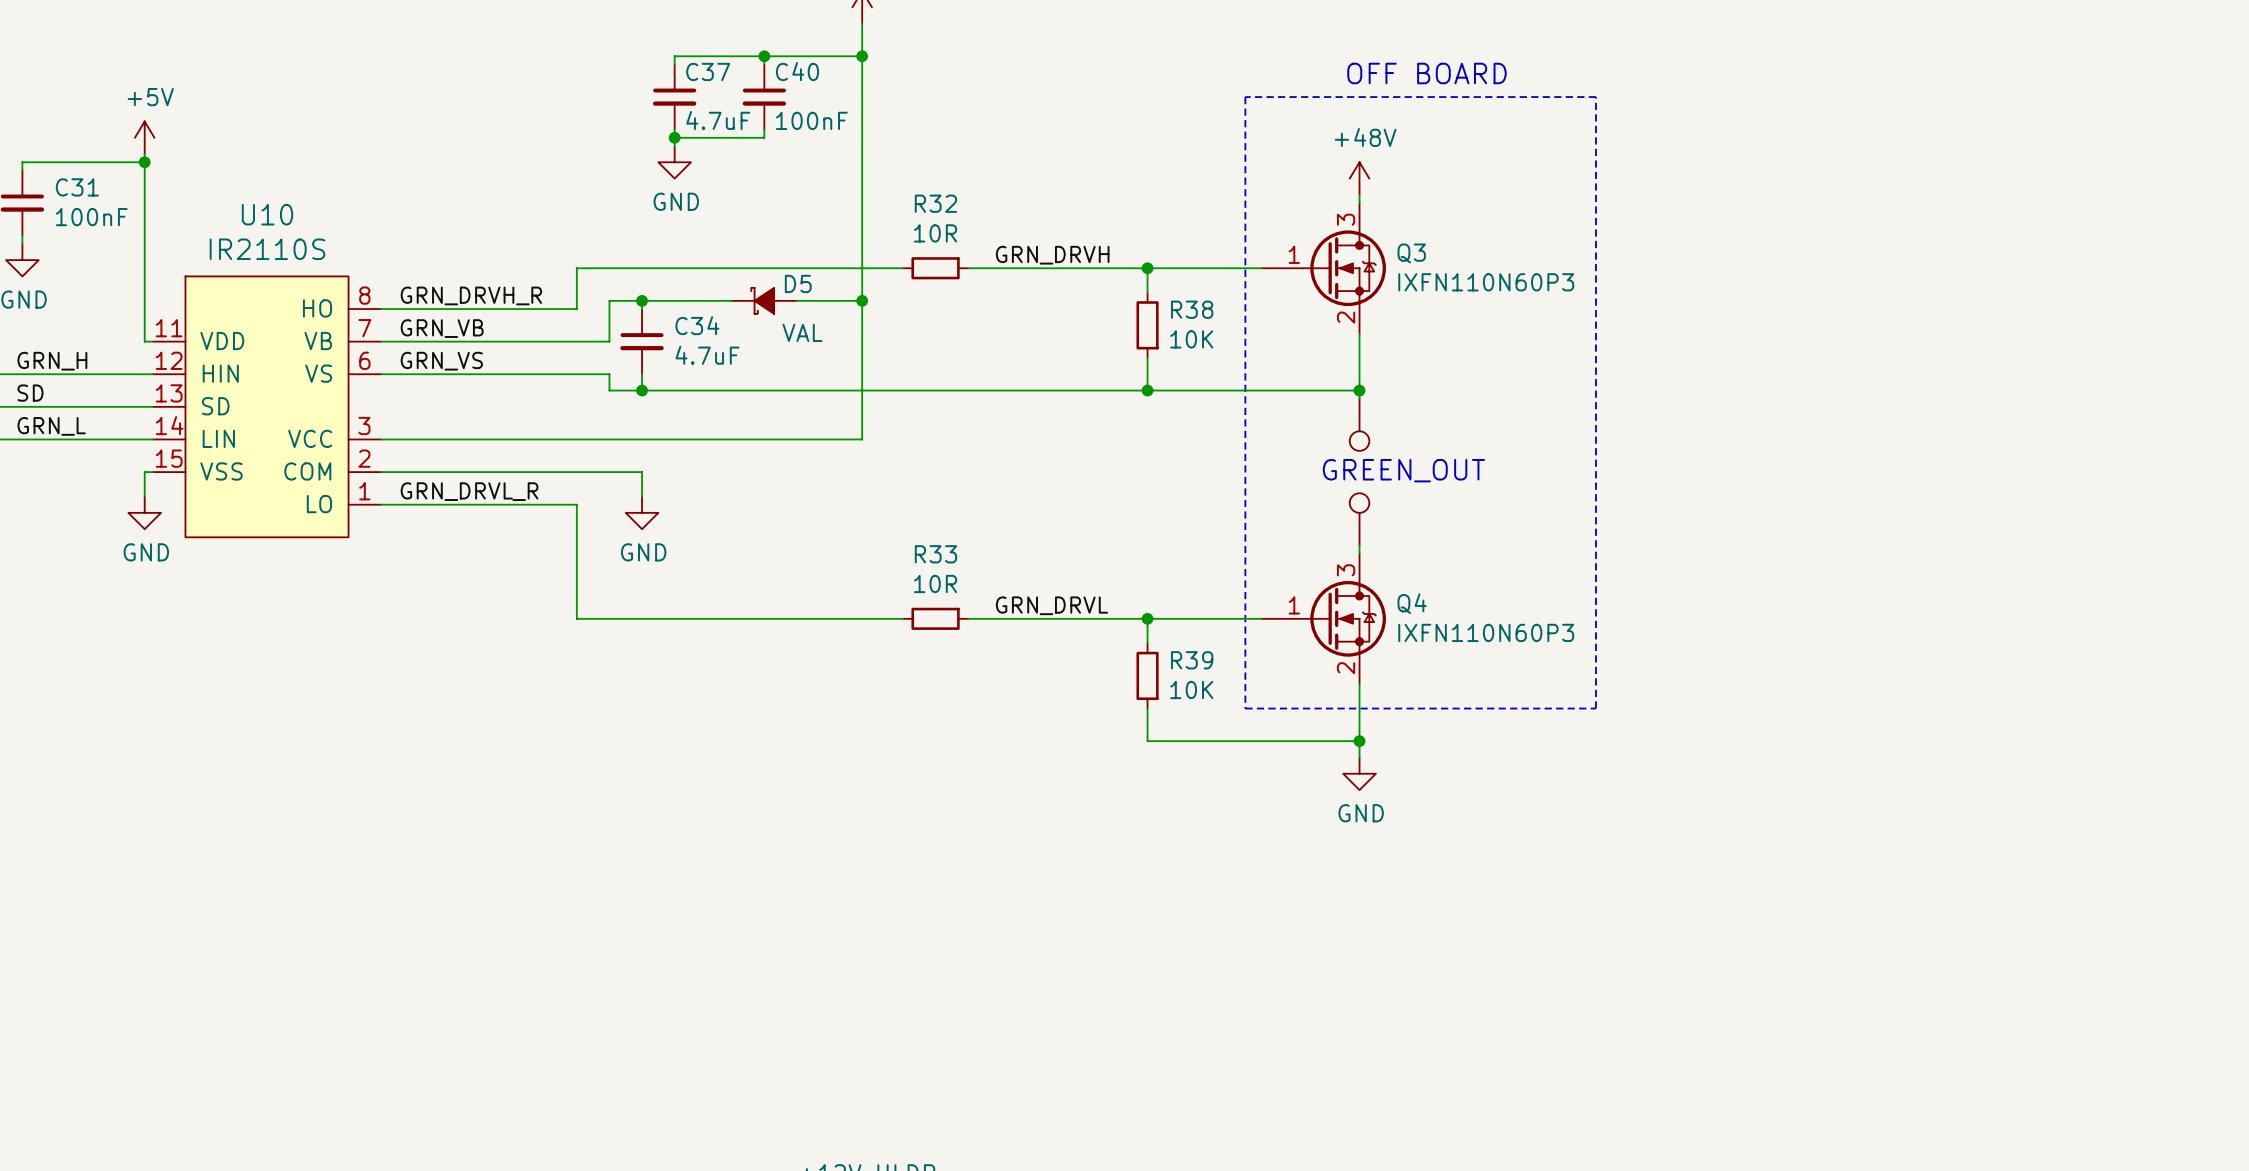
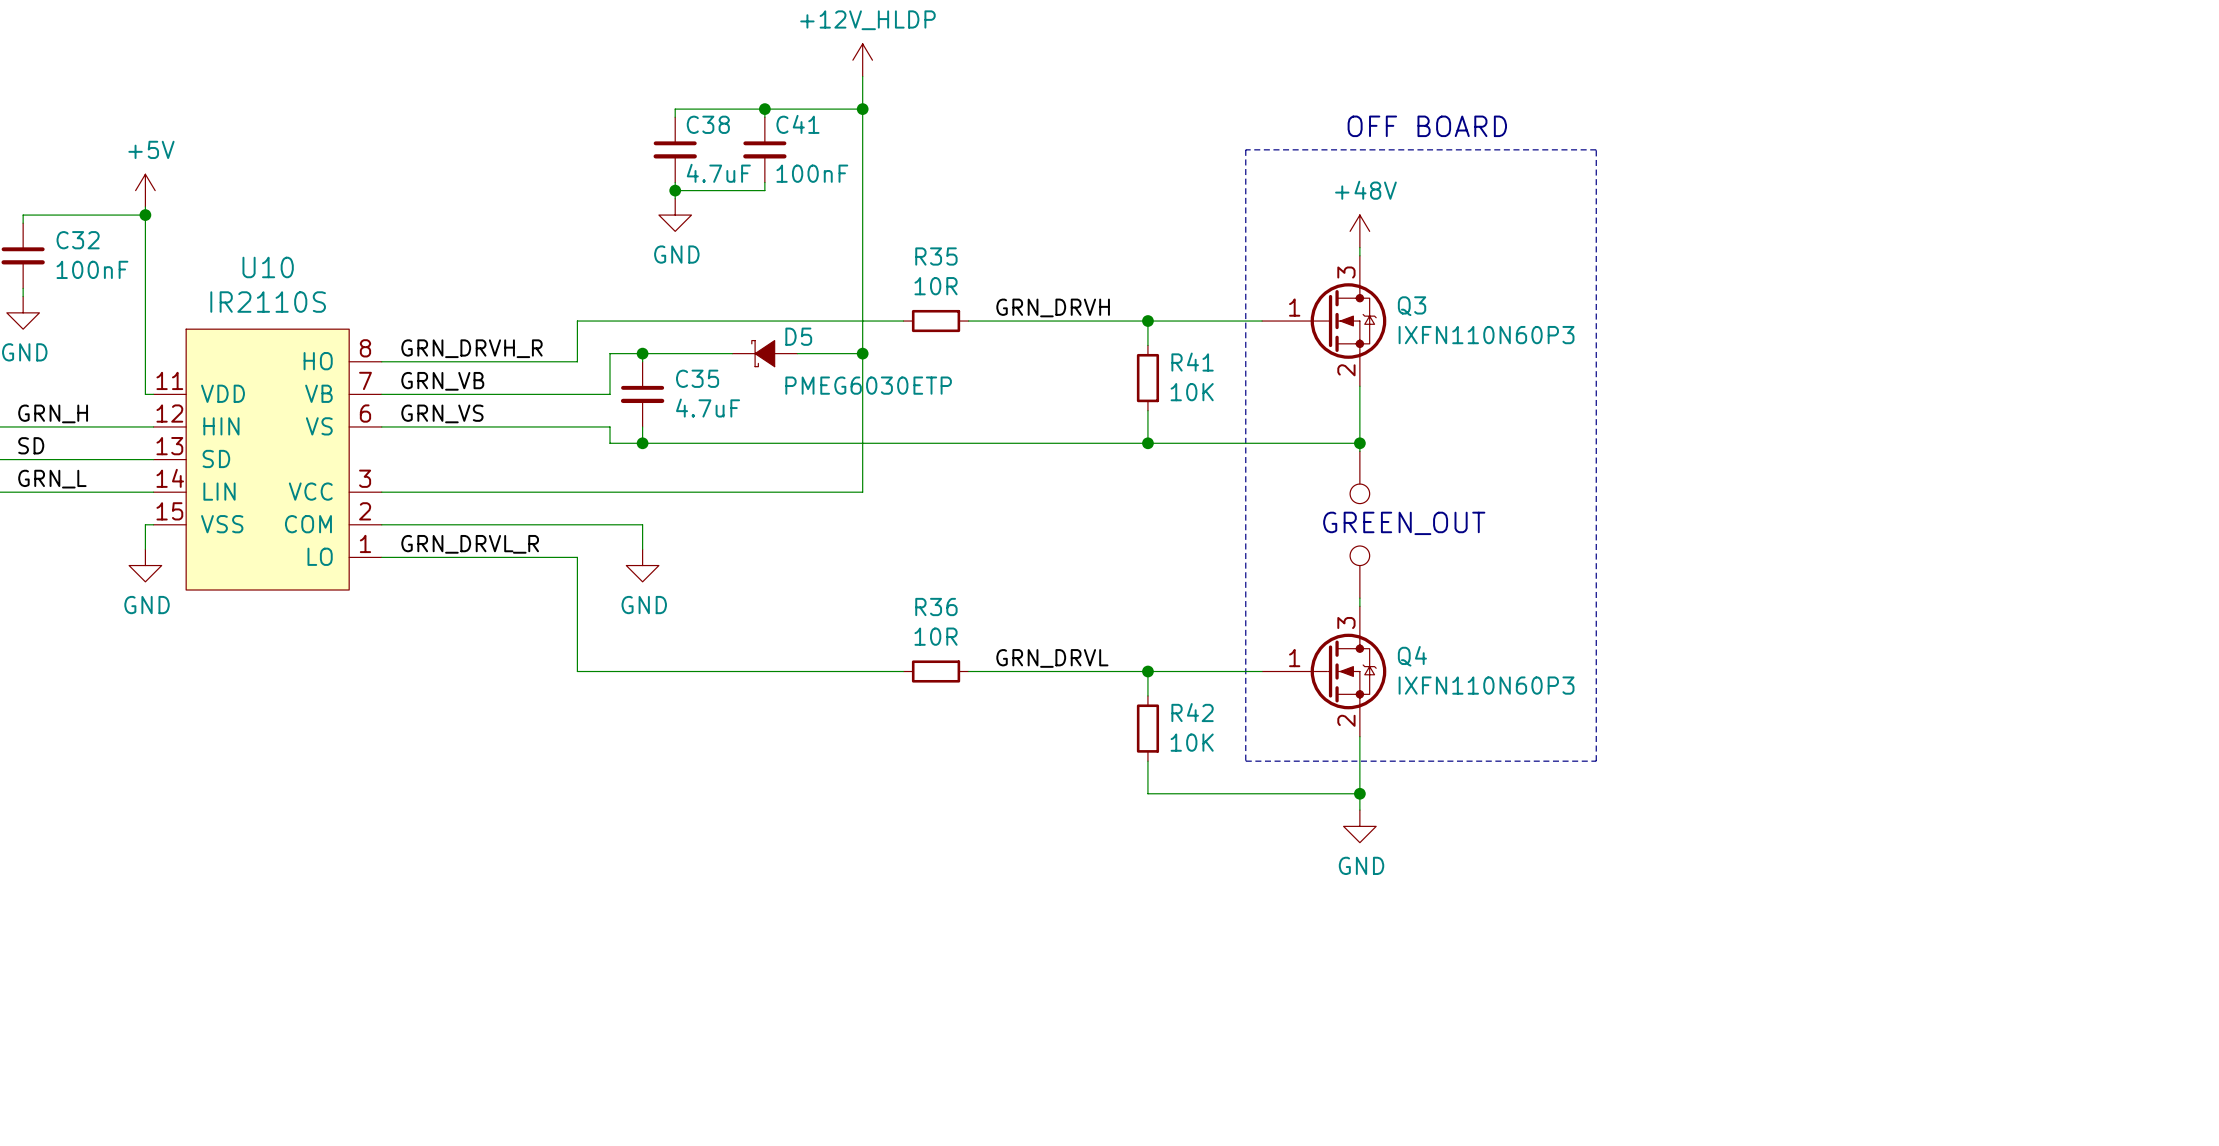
C37 name: C37 (708, 71) -> C38 (708, 124)
C40 name: C40 (797, 71) -> C41 (797, 124)
C31 name: C31 (77, 187) -> C32 (78, 240)
R32 name: R32 (935, 203) -> R35 (936, 256)
R38 name: R38 (1192, 309) -> R41 (1192, 362)
C34 name: C34 (697, 325) -> C35 (697, 378)
D5 value: VAL (802, 332) -> PMEG6030ETP (868, 385)
R33 name: R33 (935, 554) -> R36 (936, 606)
R39 name: R39 (1192, 660) -> R42 (1192, 712)

